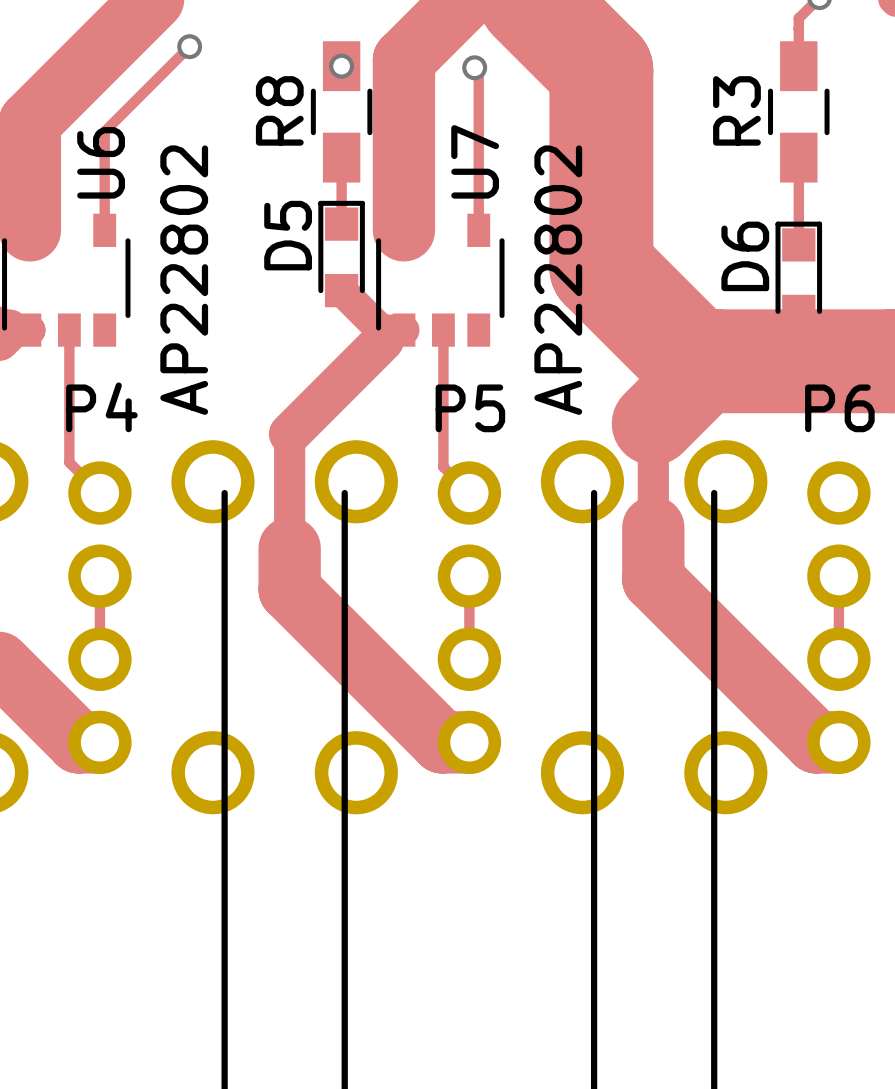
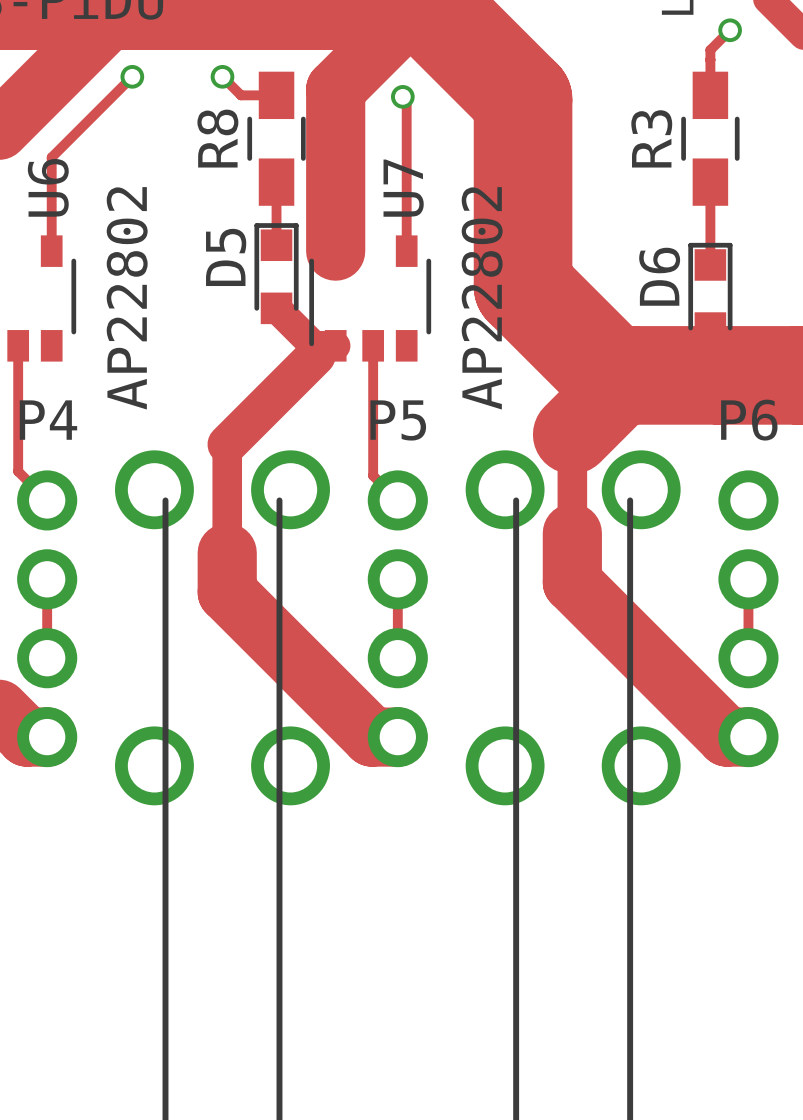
track: none -> (222, 76) (241, 95) (276, 95)
via position: (341, 66) -> (222, 76)

